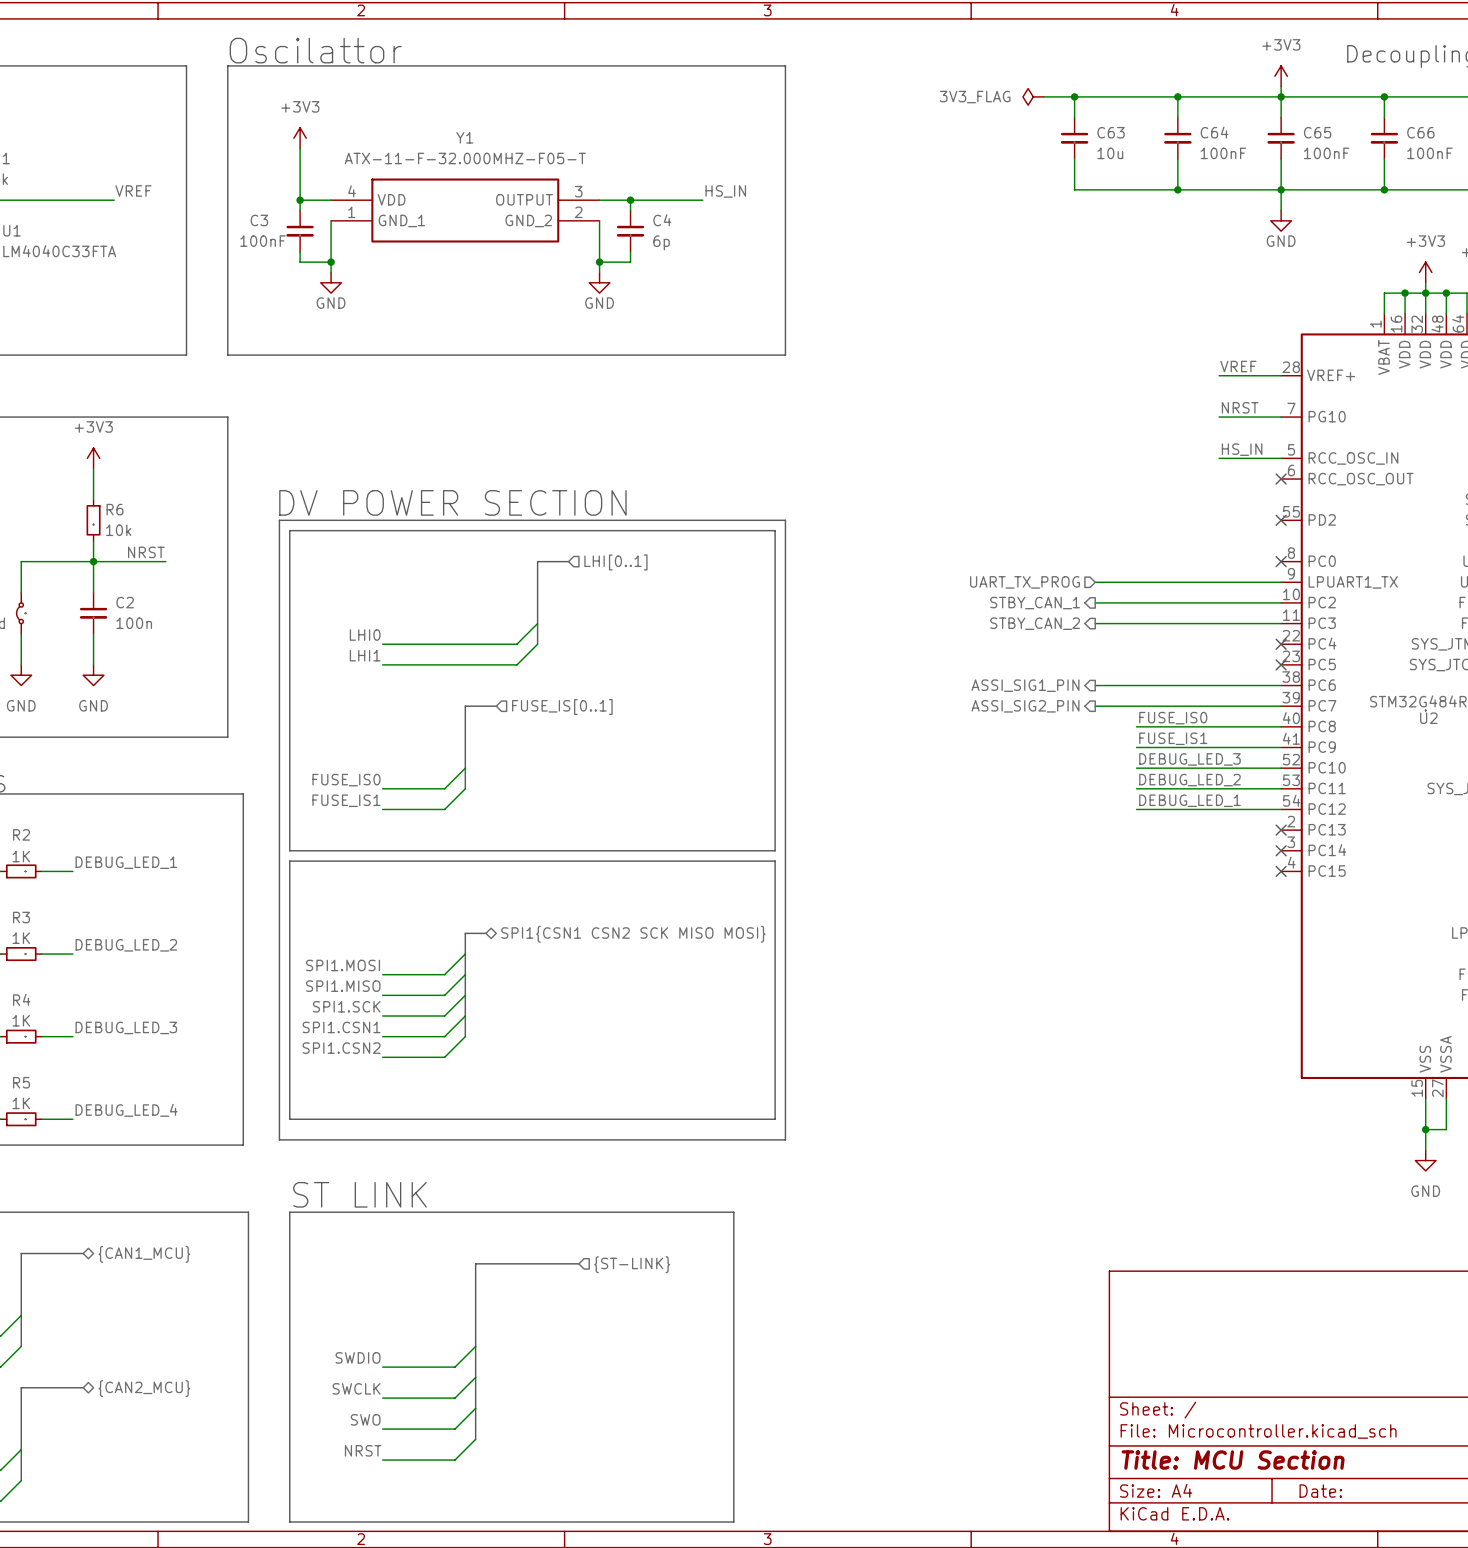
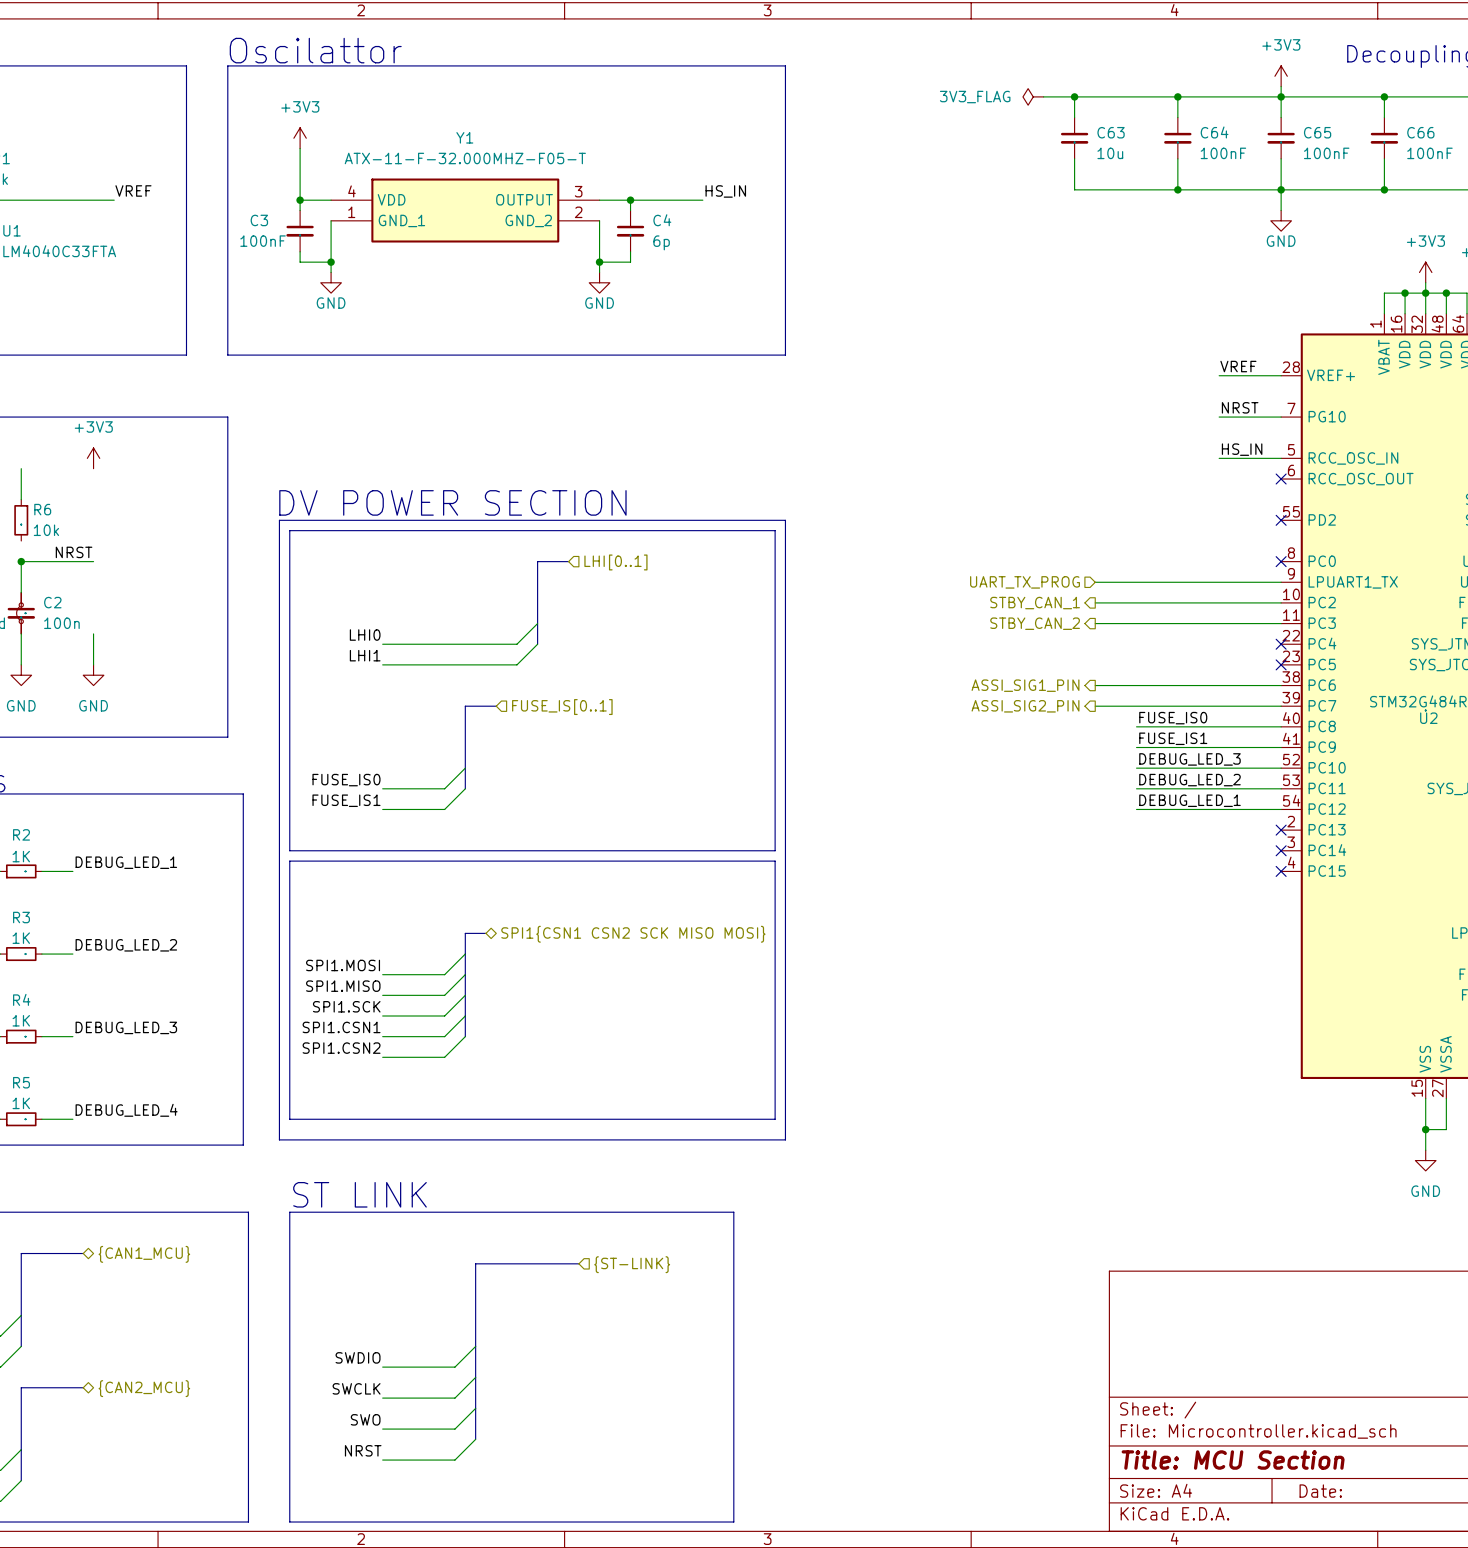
wire: (93, 468) (93, 499) -> (21, 468) (21, 499)
R6 position: (93, 520) -> (21, 520)
wire: (93, 540) (93, 592) -> none
label position: NRST (146, 552) -> NRST (74, 552)
junction: none -> (21, 561)
wire: (93, 561) (165, 561) -> none
junction: (93, 561) -> none
C2 position: (93, 613) -> (21, 613)

